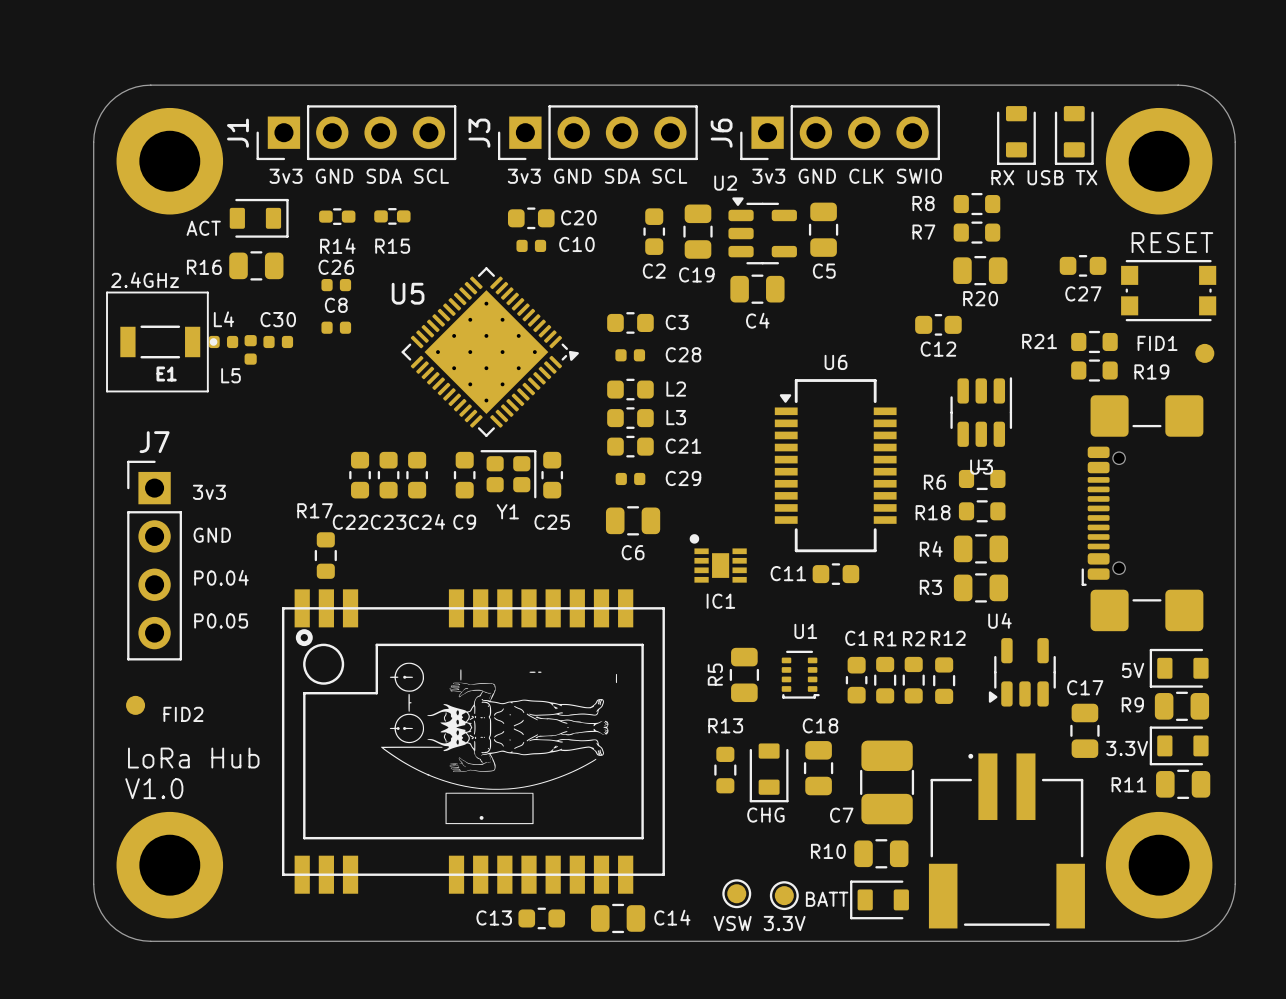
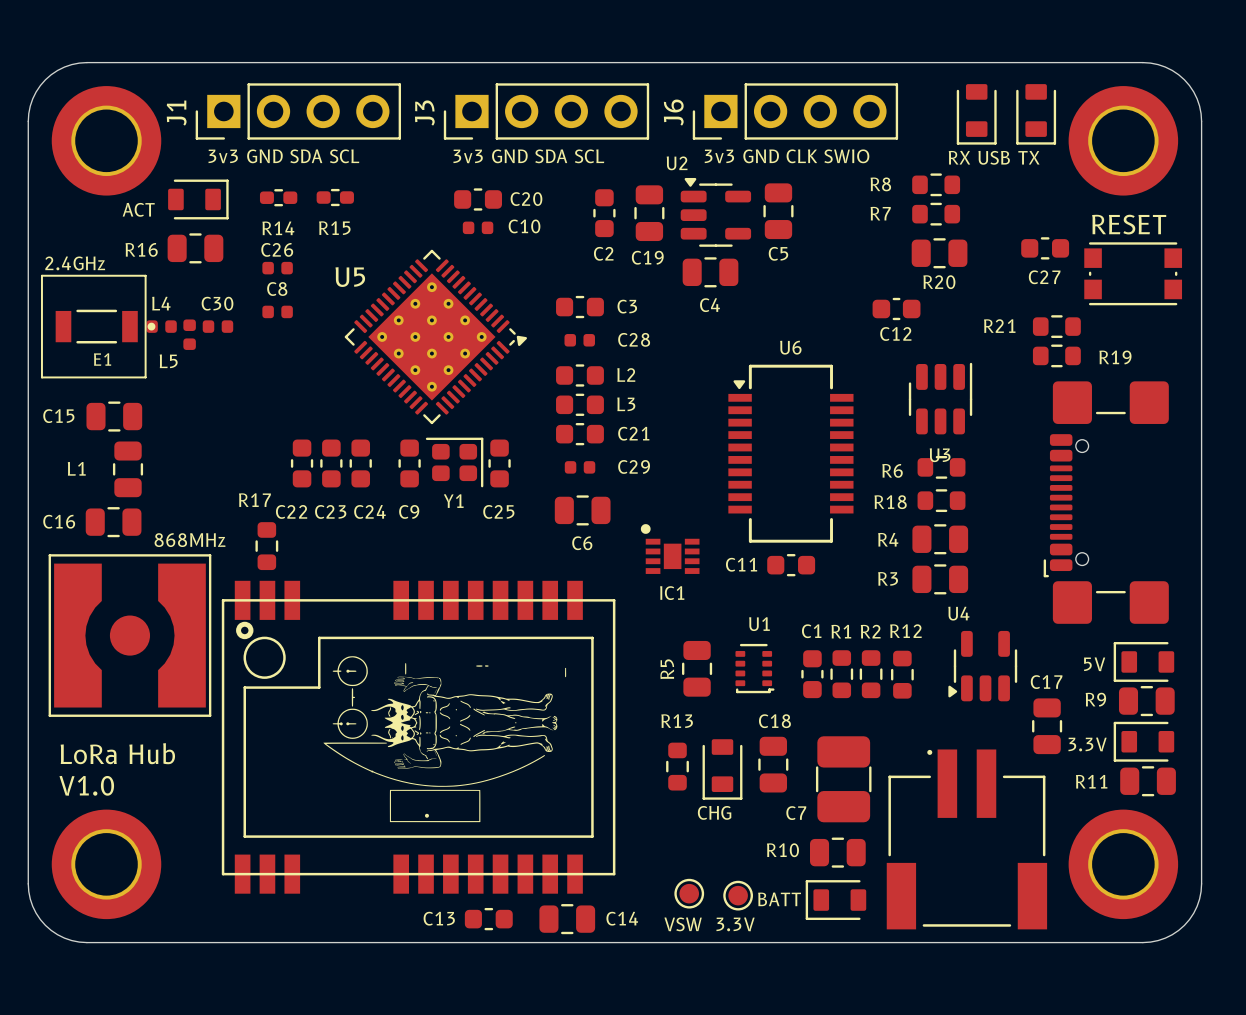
FID1: (1204, 353) -> none
C15: none -> (114, 416)
L1: none -> (128, 469)
text: 3v3 (209, 492) -> none
C16: none -> (113, 522)
text: GND (212, 535) -> none
text: none -> 868MHz (190, 540)
J7: (154, 560) -> none
text: P0.04 (221, 577) -> none
text: P0.05 (221, 620) -> none
part: none -> (129, 635)
FID2: (135, 705) -> none

